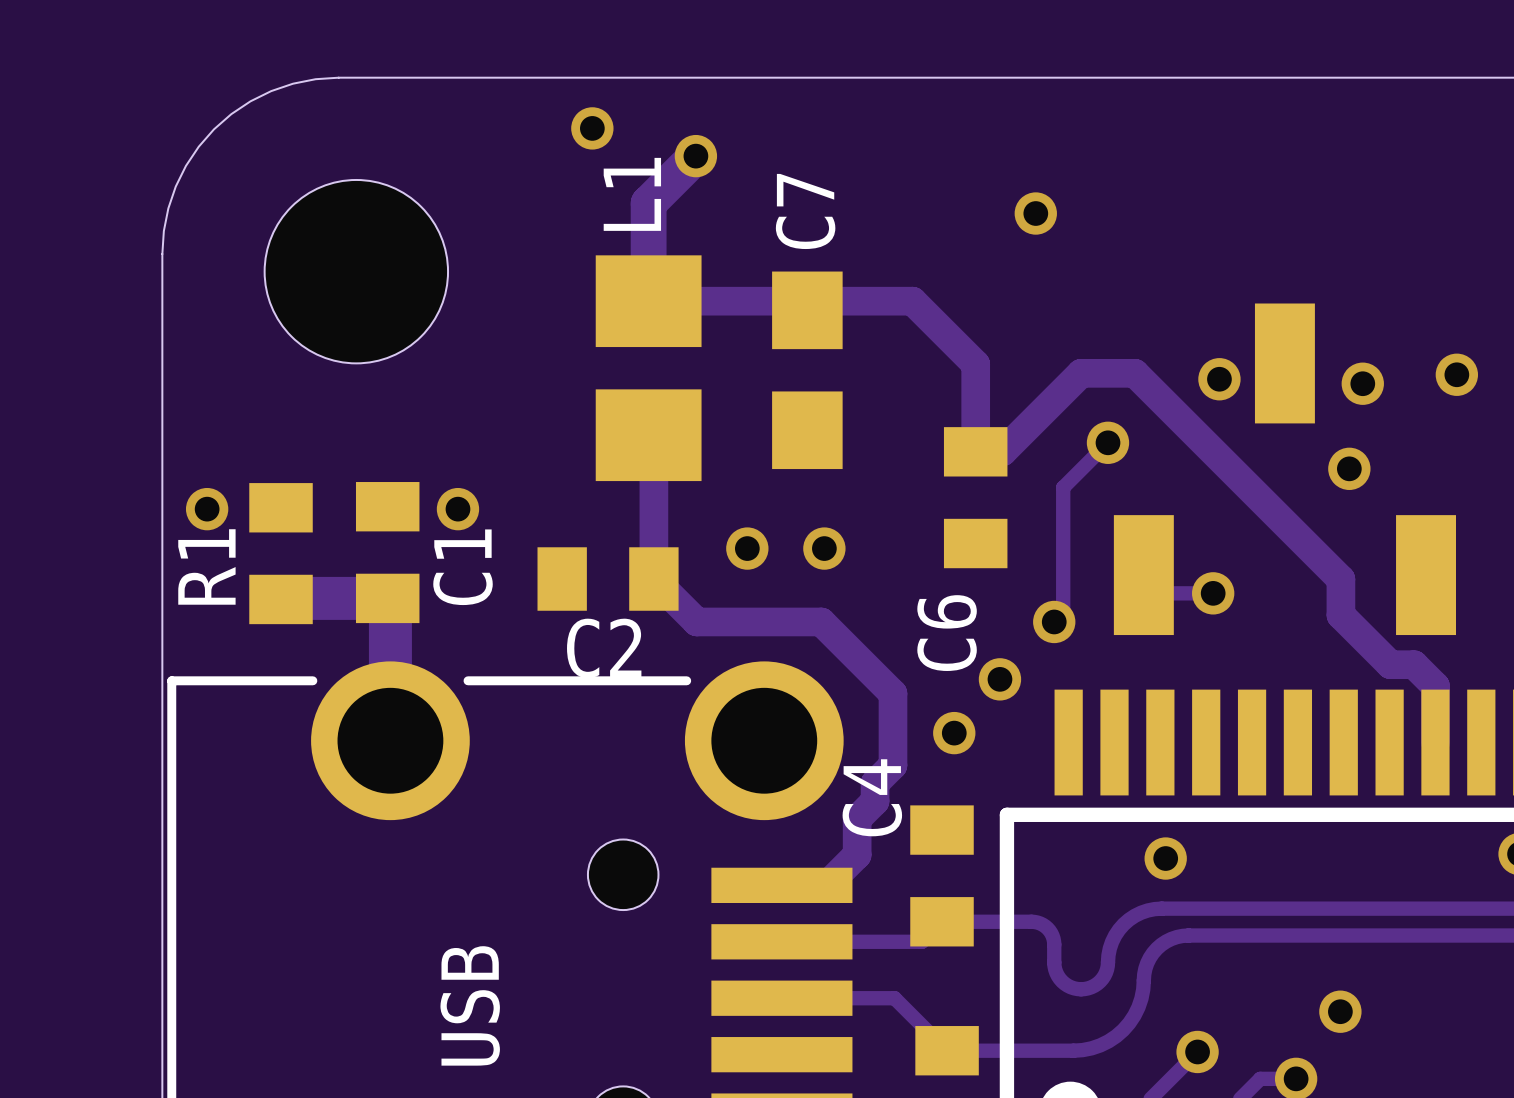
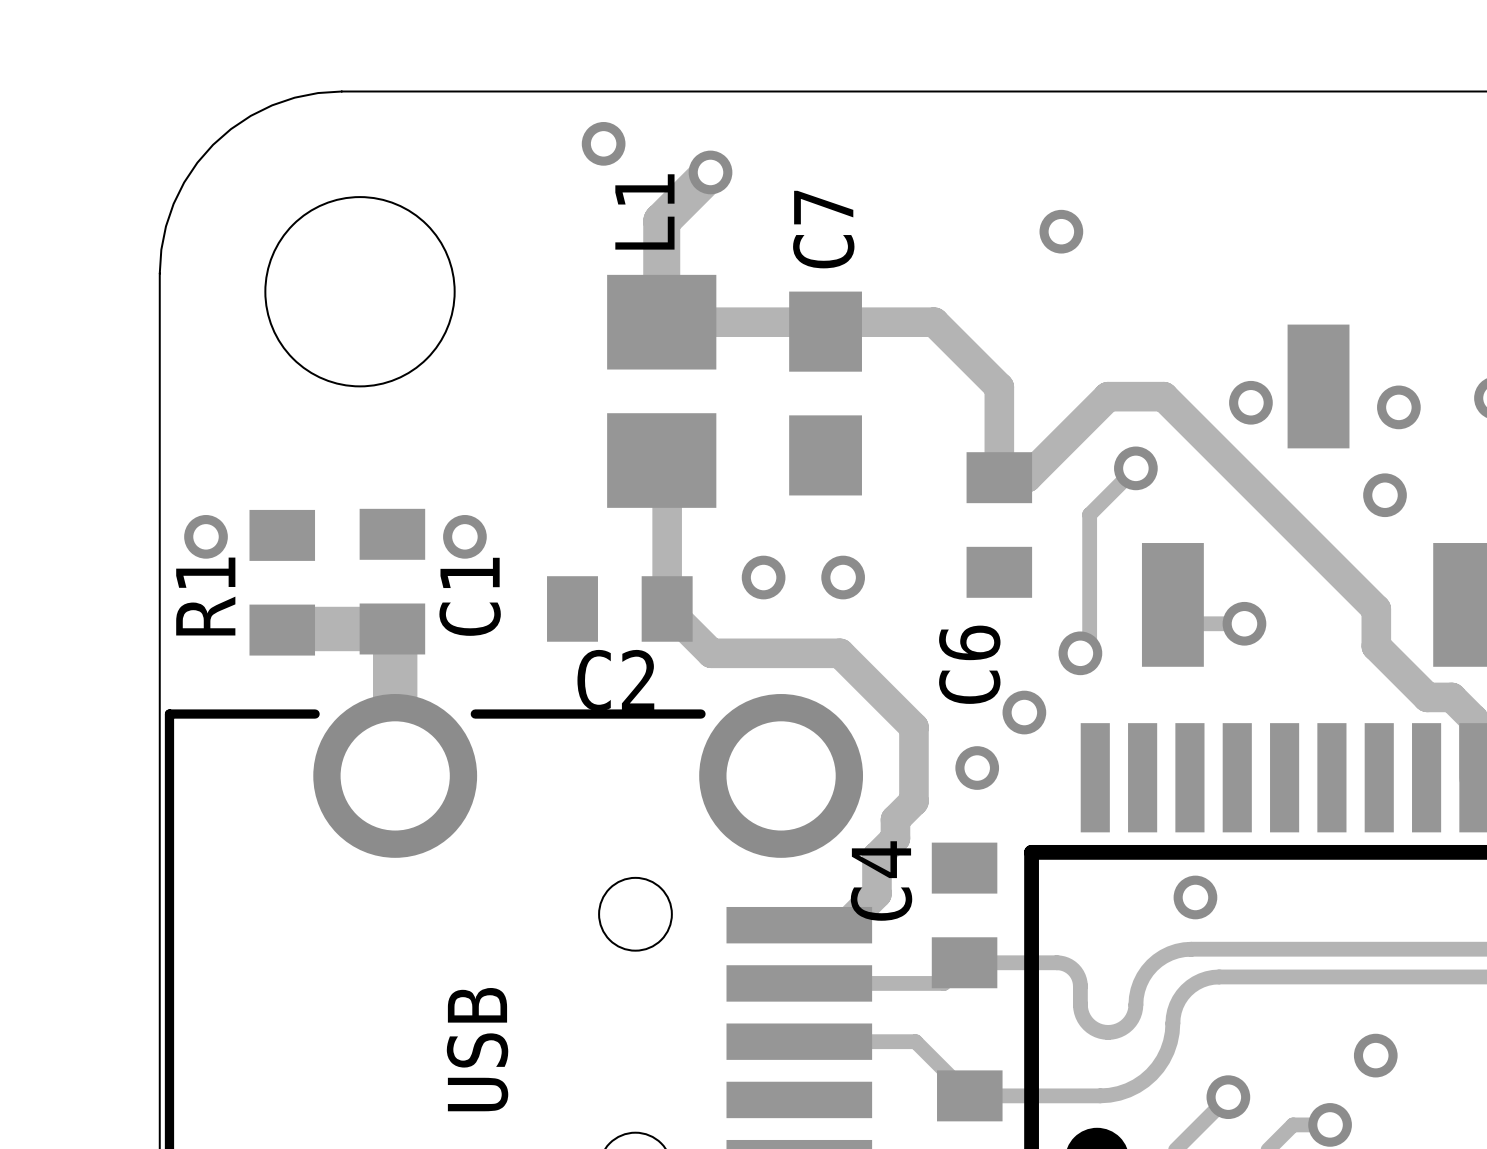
C4 name position: C4 (872, 797) -> C4 (881, 881)

